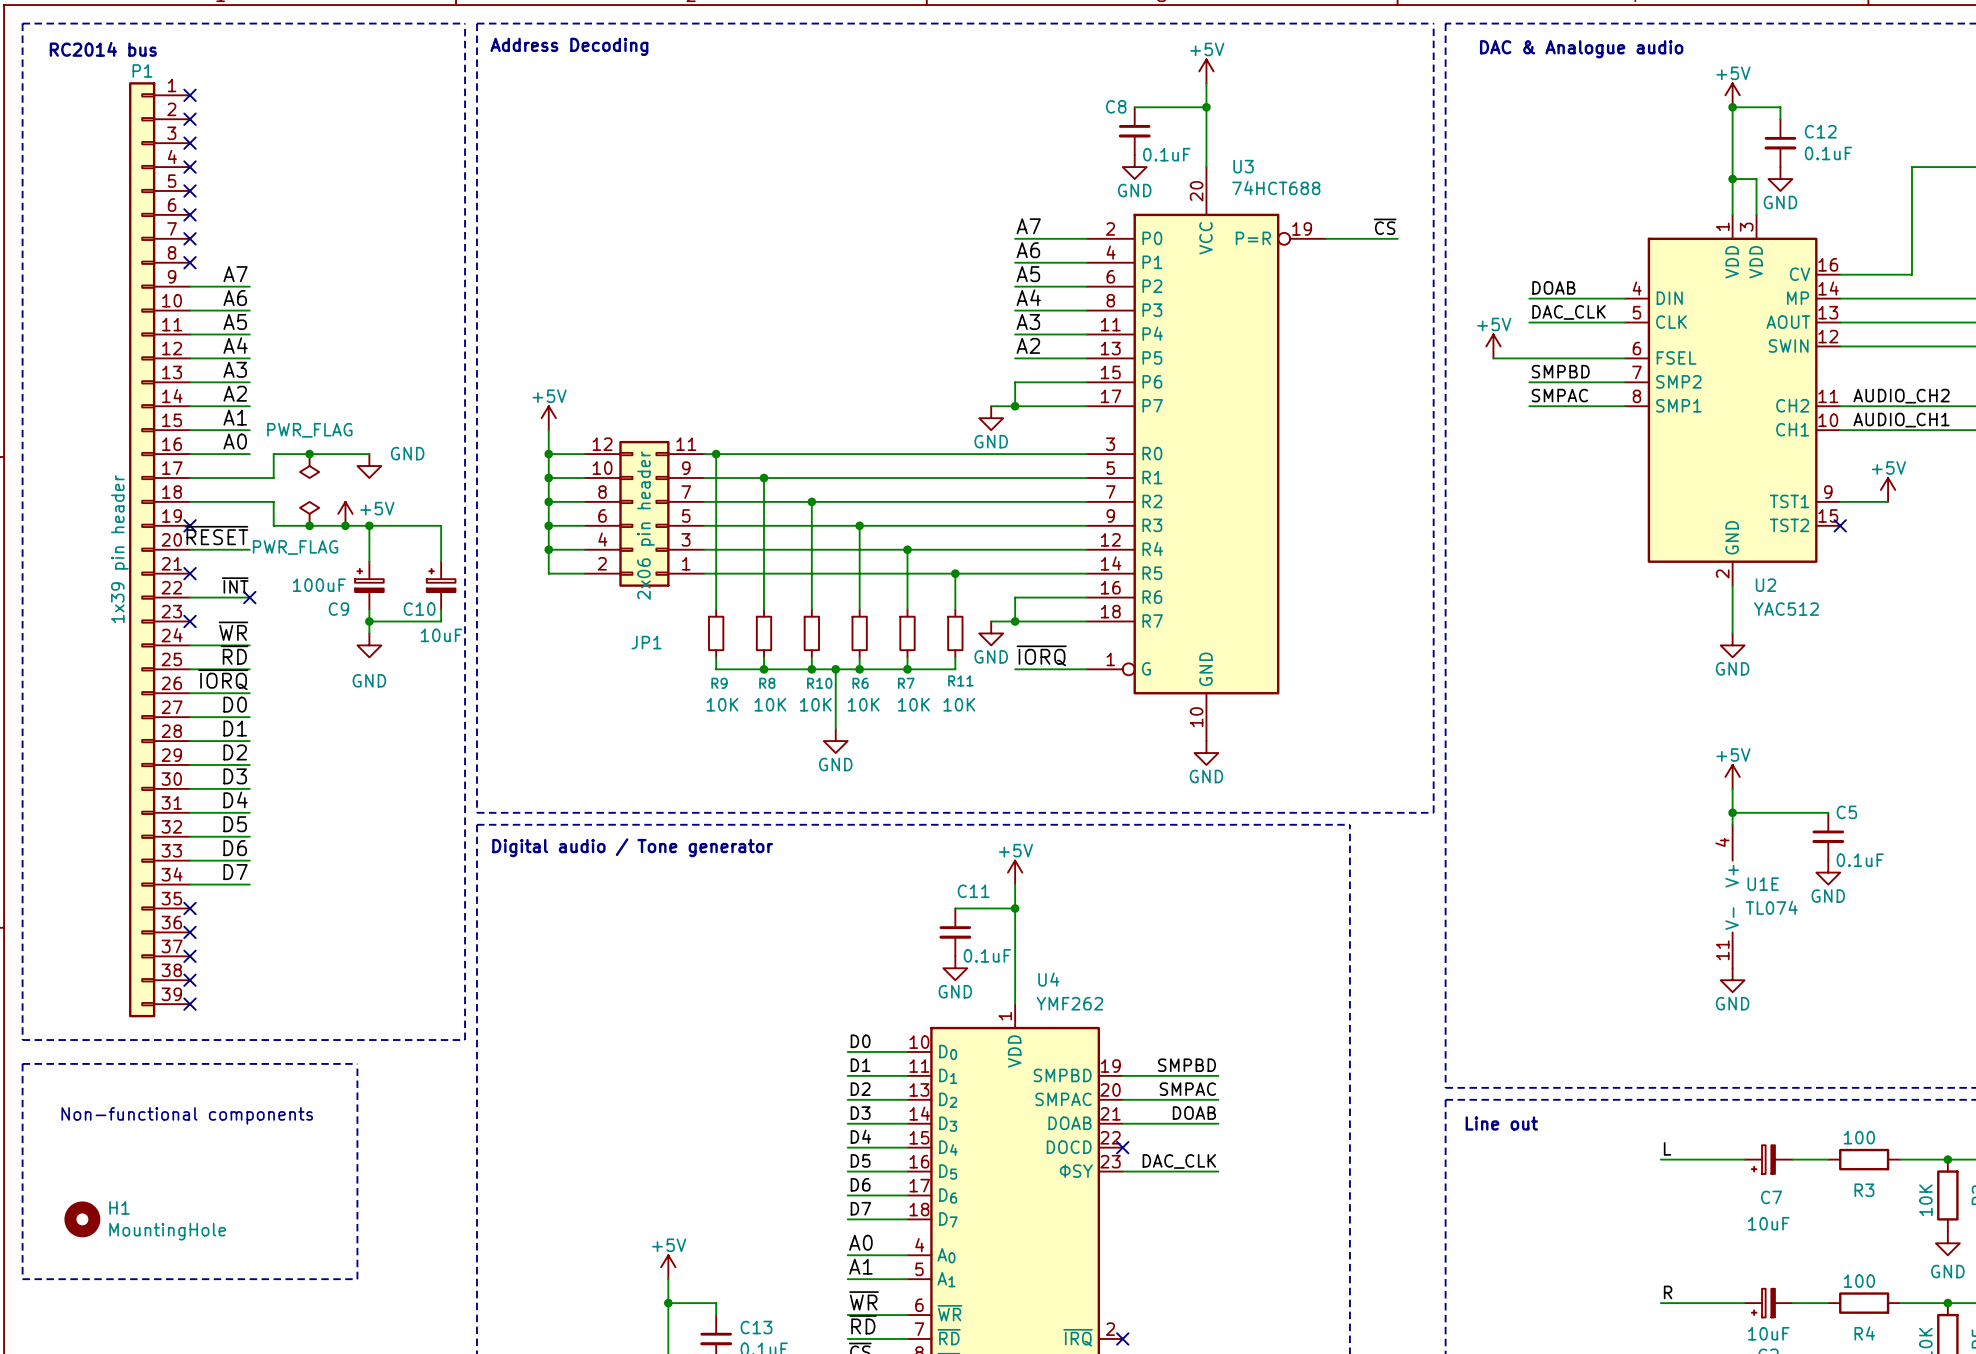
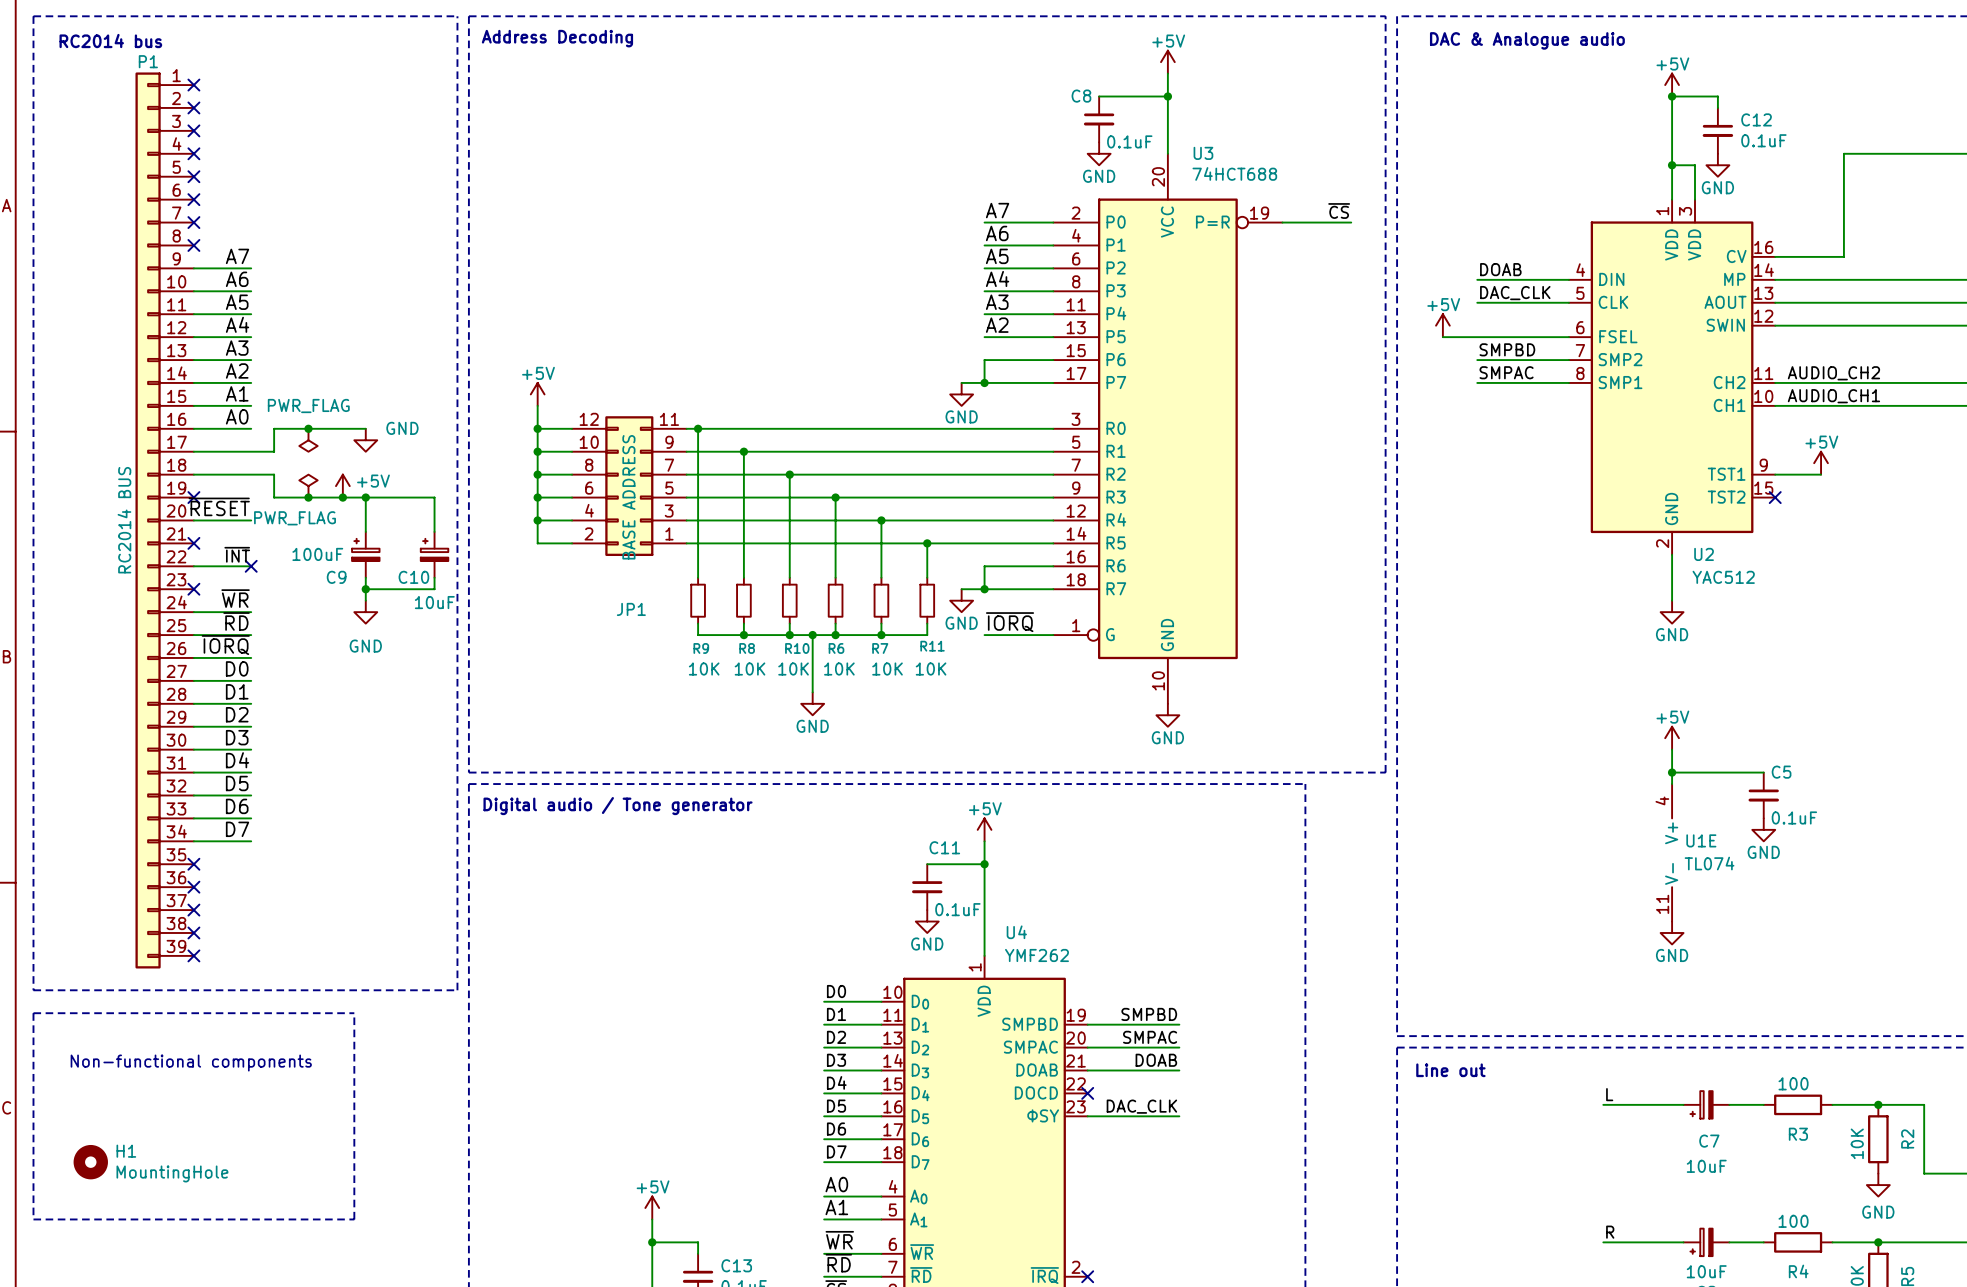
JP1 value: 2x06 pin header (645, 525) -> BASE ADDRESS (628, 497)
P1 value: 1x39 pin header (119, 549) -> RC2014 BUS (124, 520)

